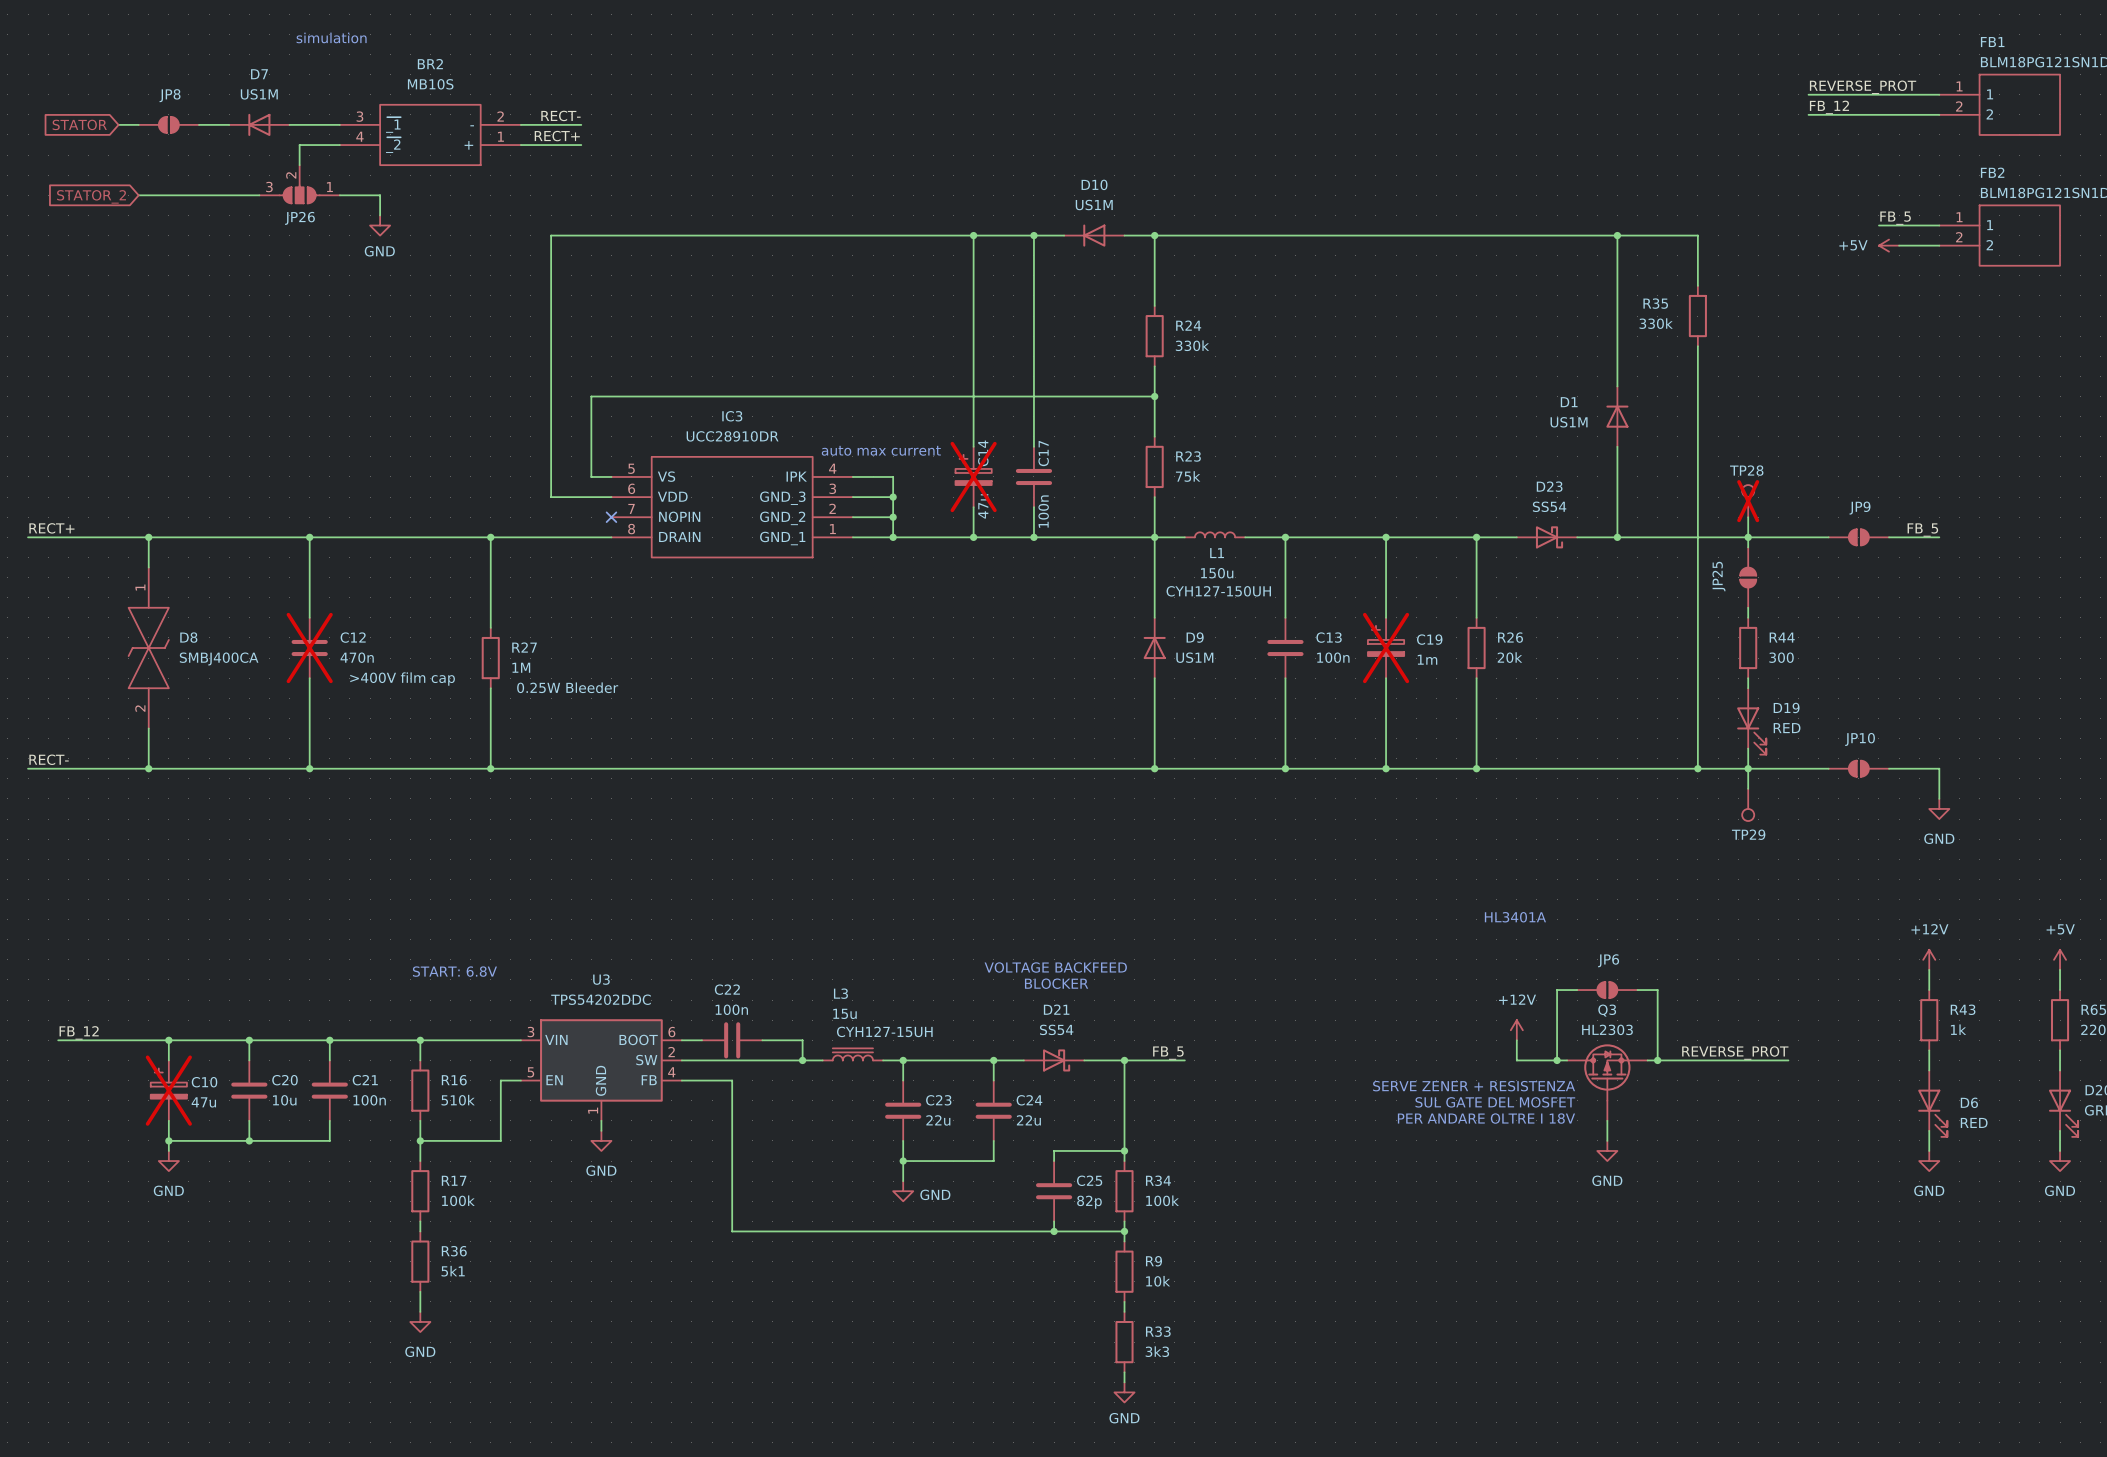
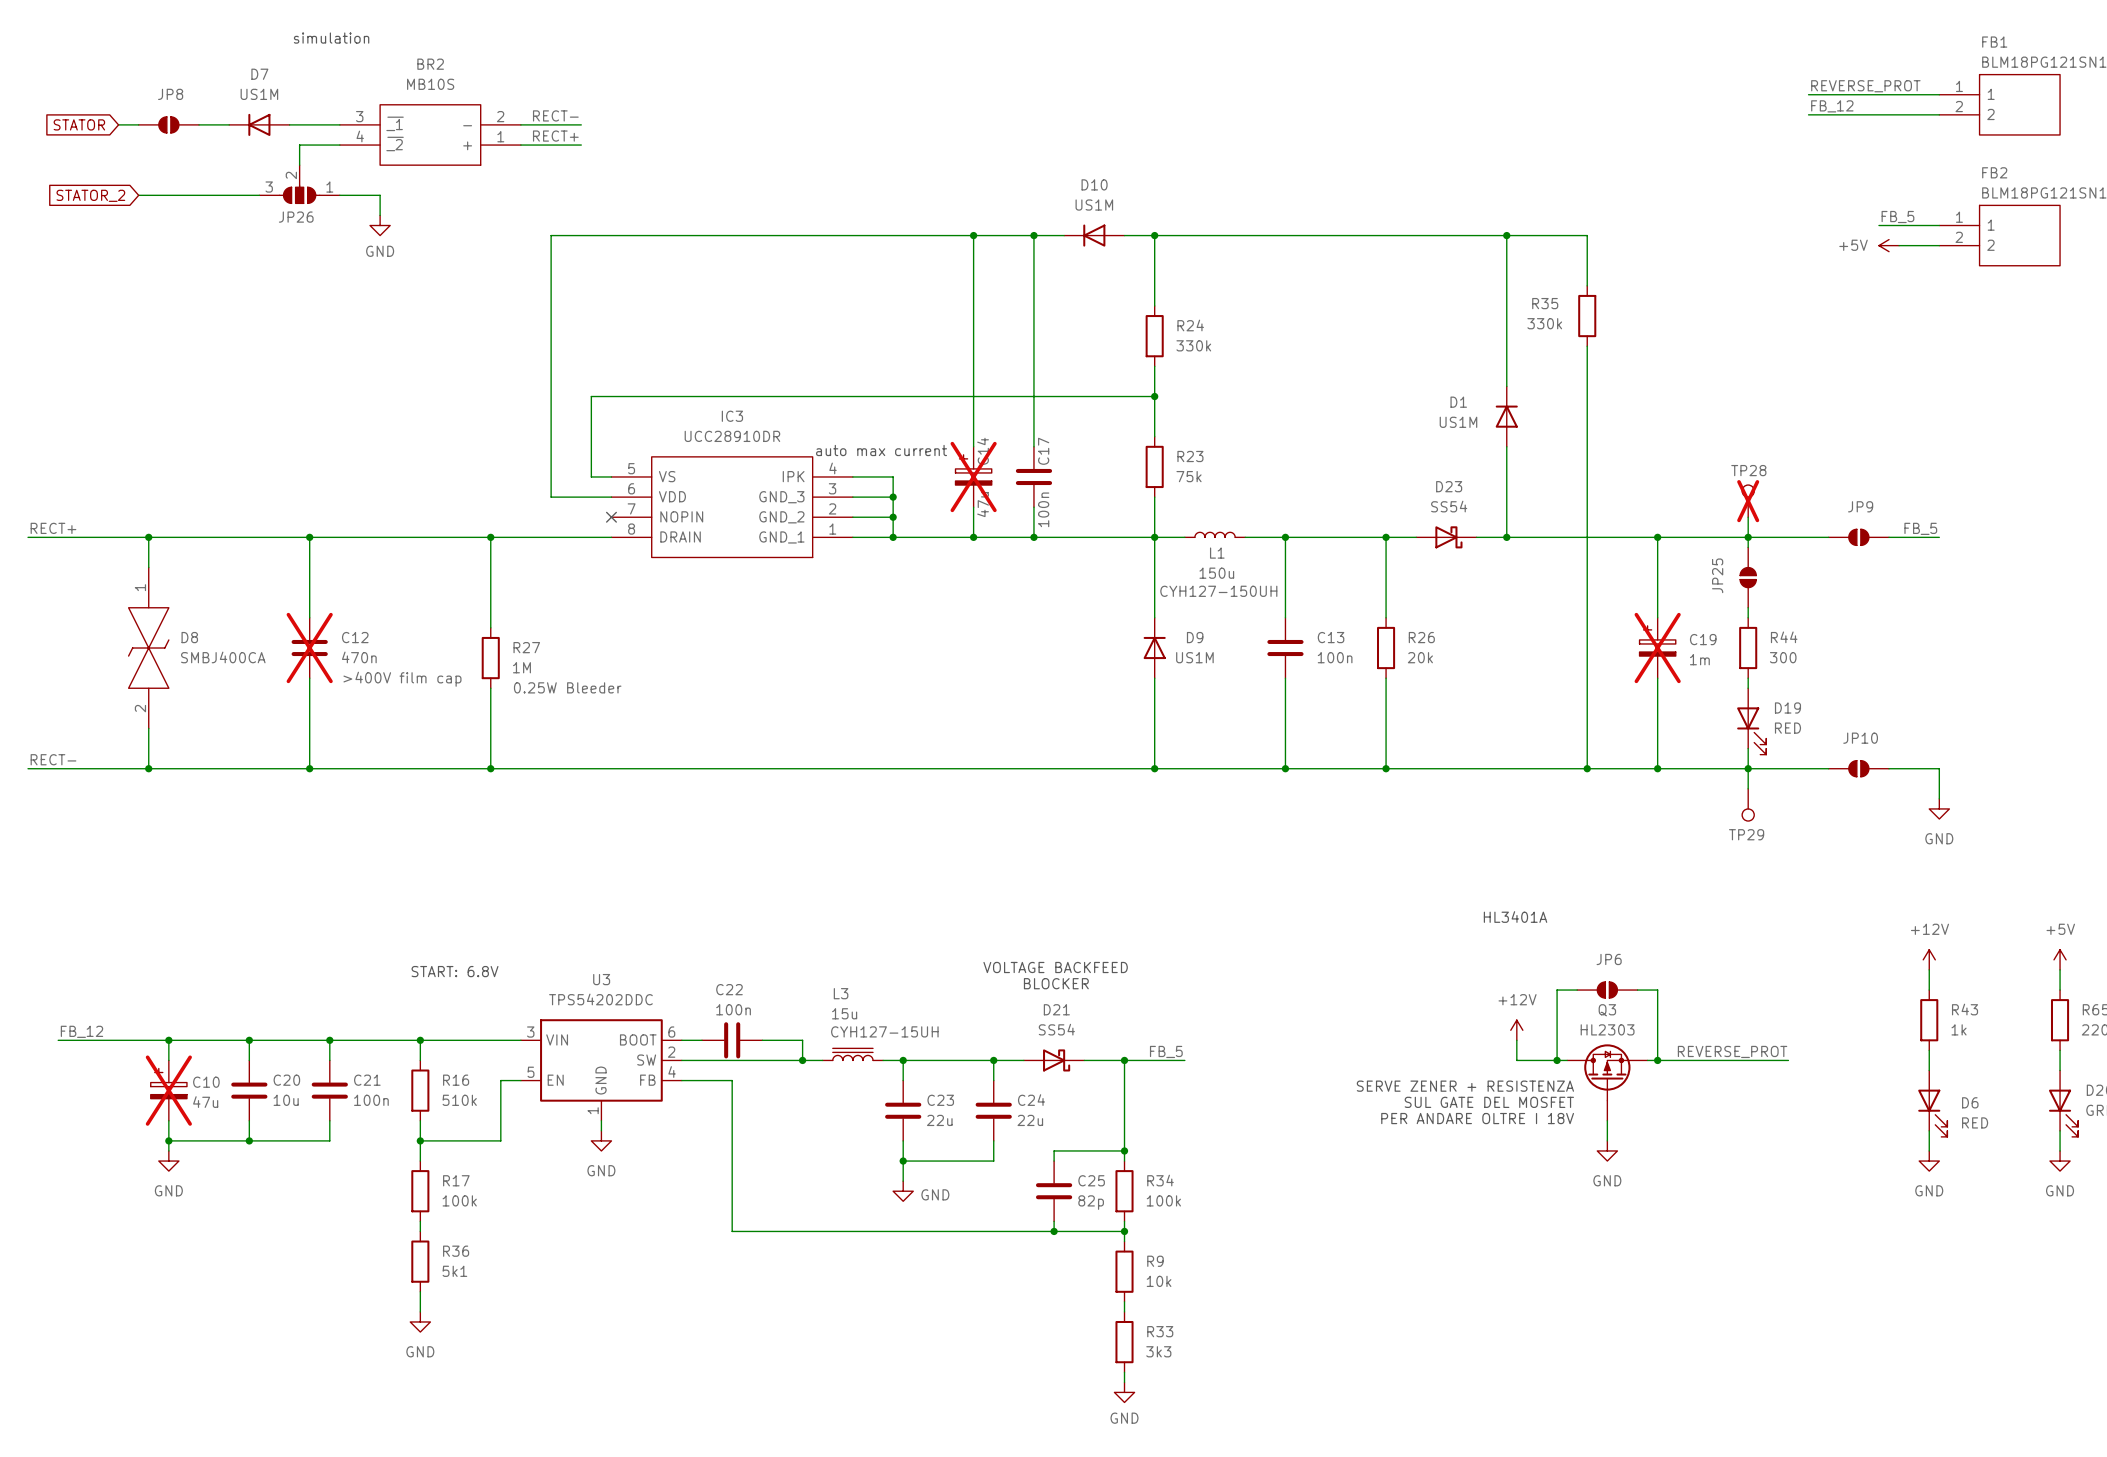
junction: none -> (1506, 235)
wire: (1587, 235) (1697, 235) (1697, 285) -> (1587, 235) (1587, 285)
wire: (1617, 235) (1617, 386) -> (1506, 235) (1506, 386)
junction: (1617, 235) -> none
R35 position: (1697, 316) -> (1587, 316)
wire: (1697, 346) (1697, 768) -> (1587, 346) (1587, 768)
D1 position: (1617, 416) -> (1506, 416)
wire: (1617, 446) (1617, 537) -> (1506, 446) (1506, 537)
wire: (1416, 537) (1476, 537) (1476, 617) -> none
junction position: (1476, 537) -> (1506, 537)
D23 position: (1547, 537) -> (1446, 537)
junction position: (1617, 537) -> (1657, 537)
wire: none -> (1657, 537) (1657, 617)
C19 position: (1386, 648) -> (1657, 648)
R26 position: (1476, 648) -> (1386, 648)
wire: (1476, 678) (1476, 768) -> (1657, 678) (1657, 768)
junction: (1476, 768) -> none
junction: none -> (1587, 768)
junction position: (1697, 768) -> (1657, 768)

